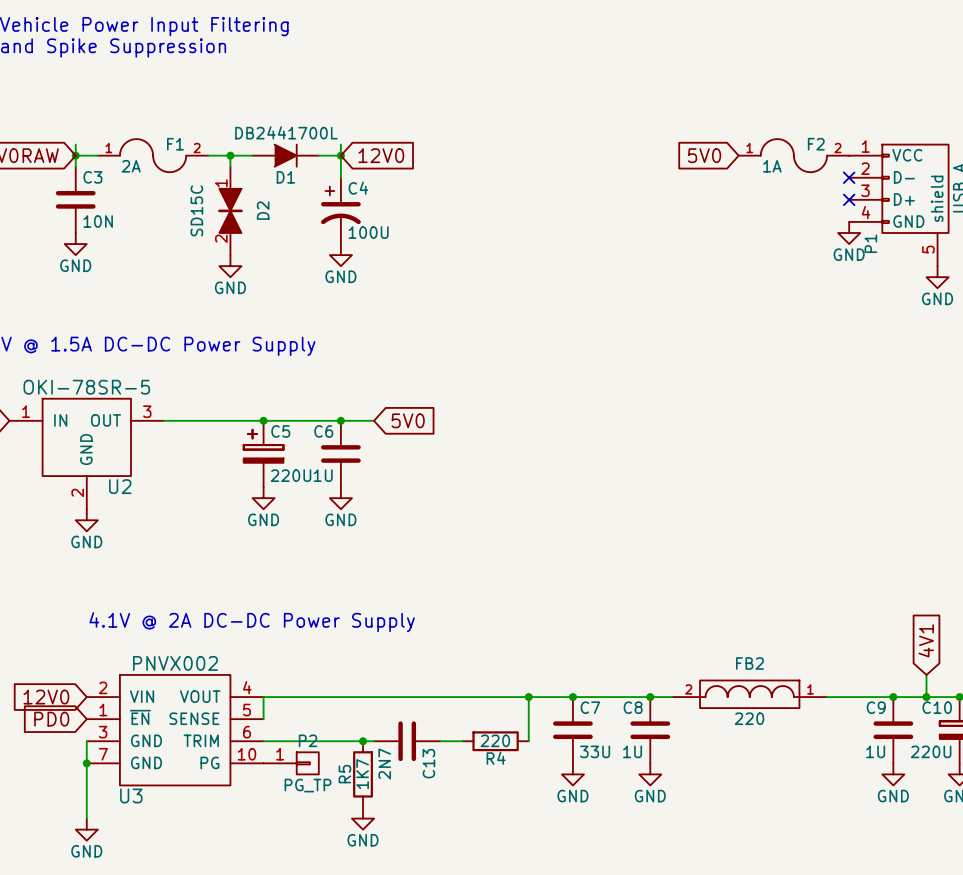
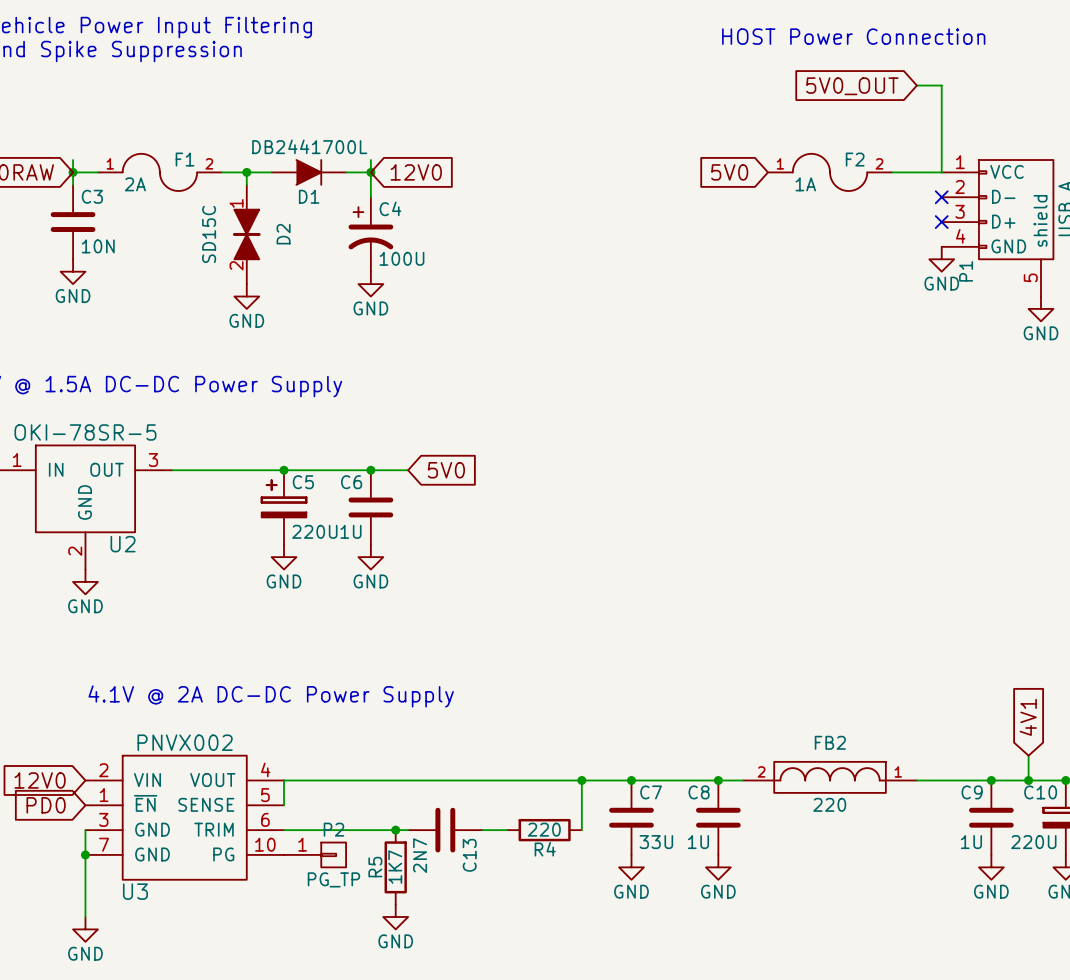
text: none -> HOST Power Connection (853, 36)
global label: none -> 5V0_OUT (852, 86)
wire: none -> (916, 85) (941, 85) (941, 172) (892, 172)
global label position: 5V0 (704, 155) -> 5V0 (729, 172)
F2 position: (793, 155) -> (830, 172)

